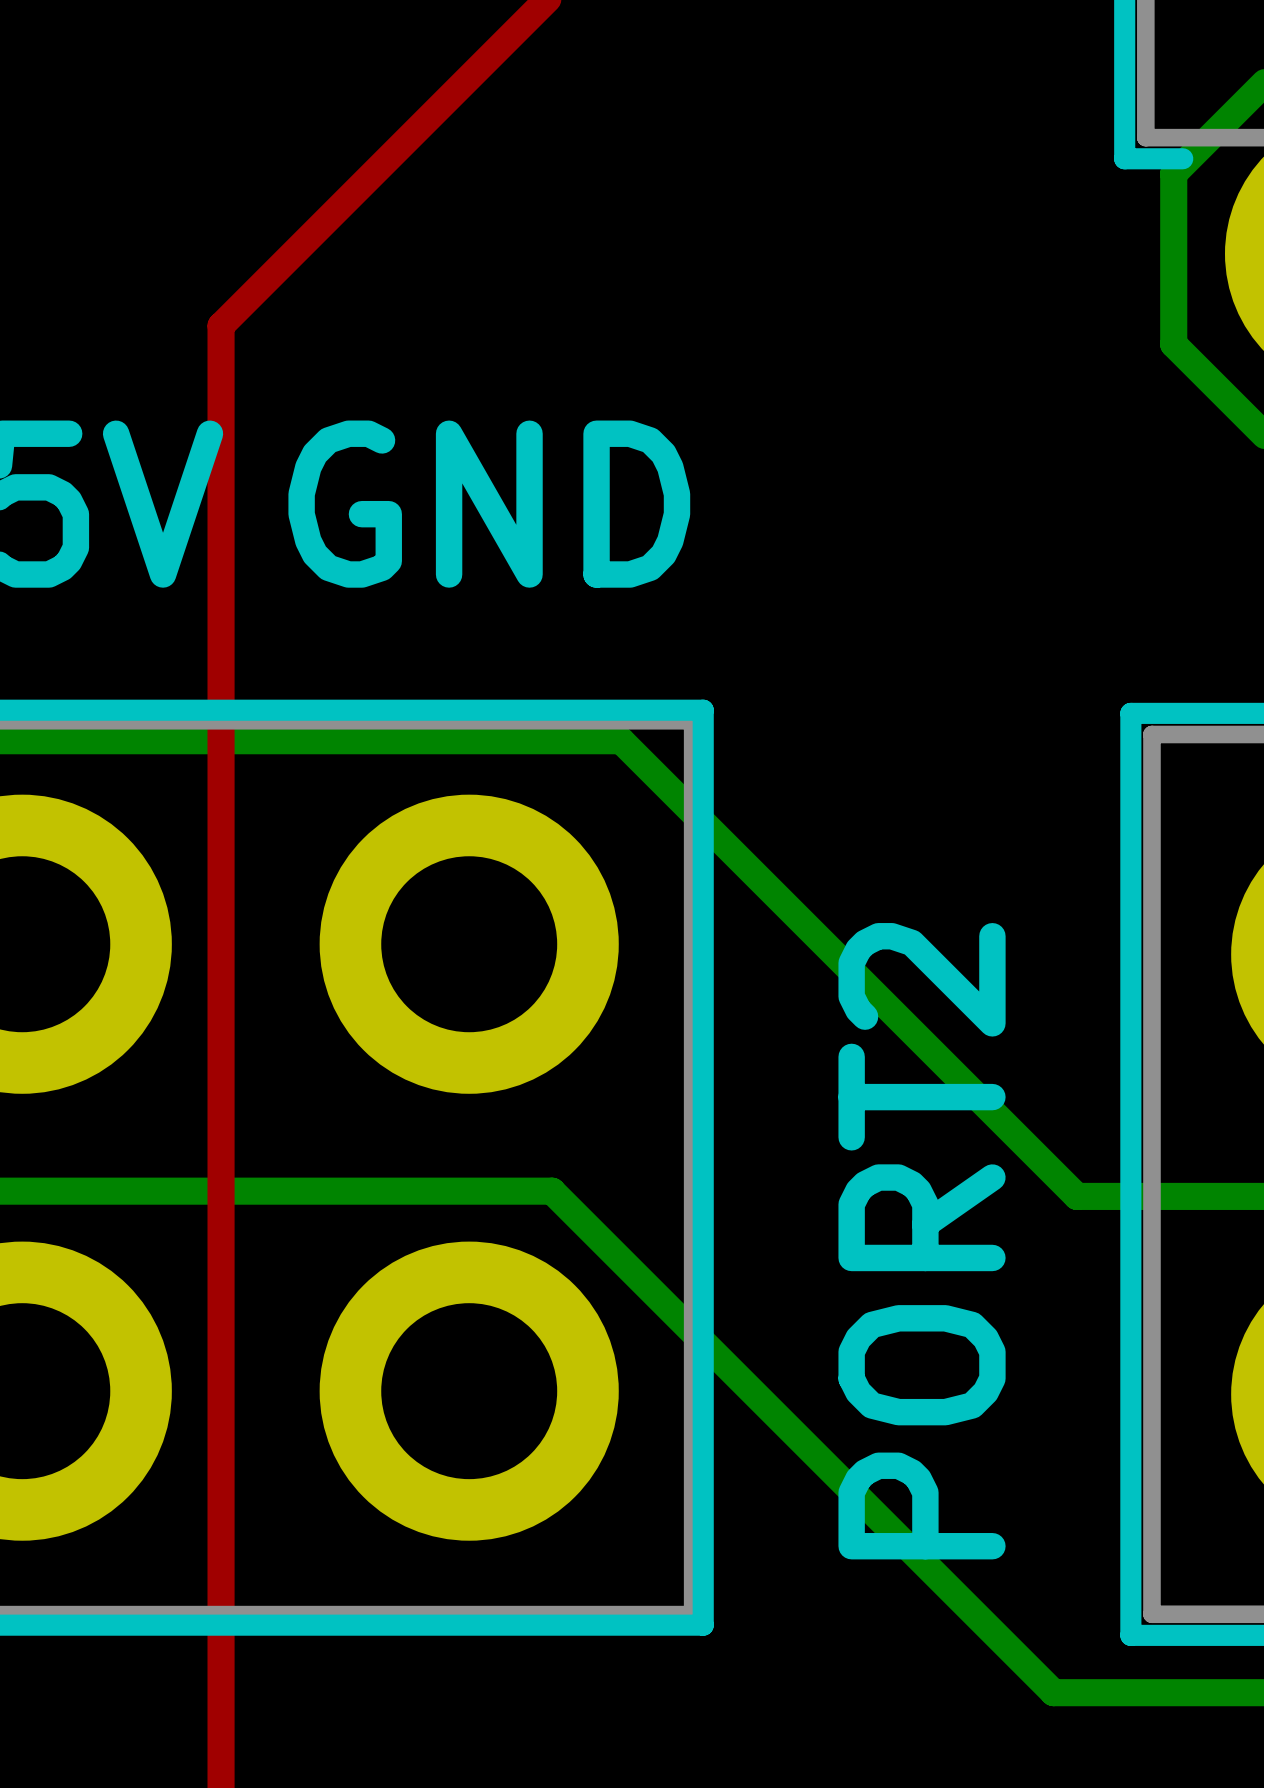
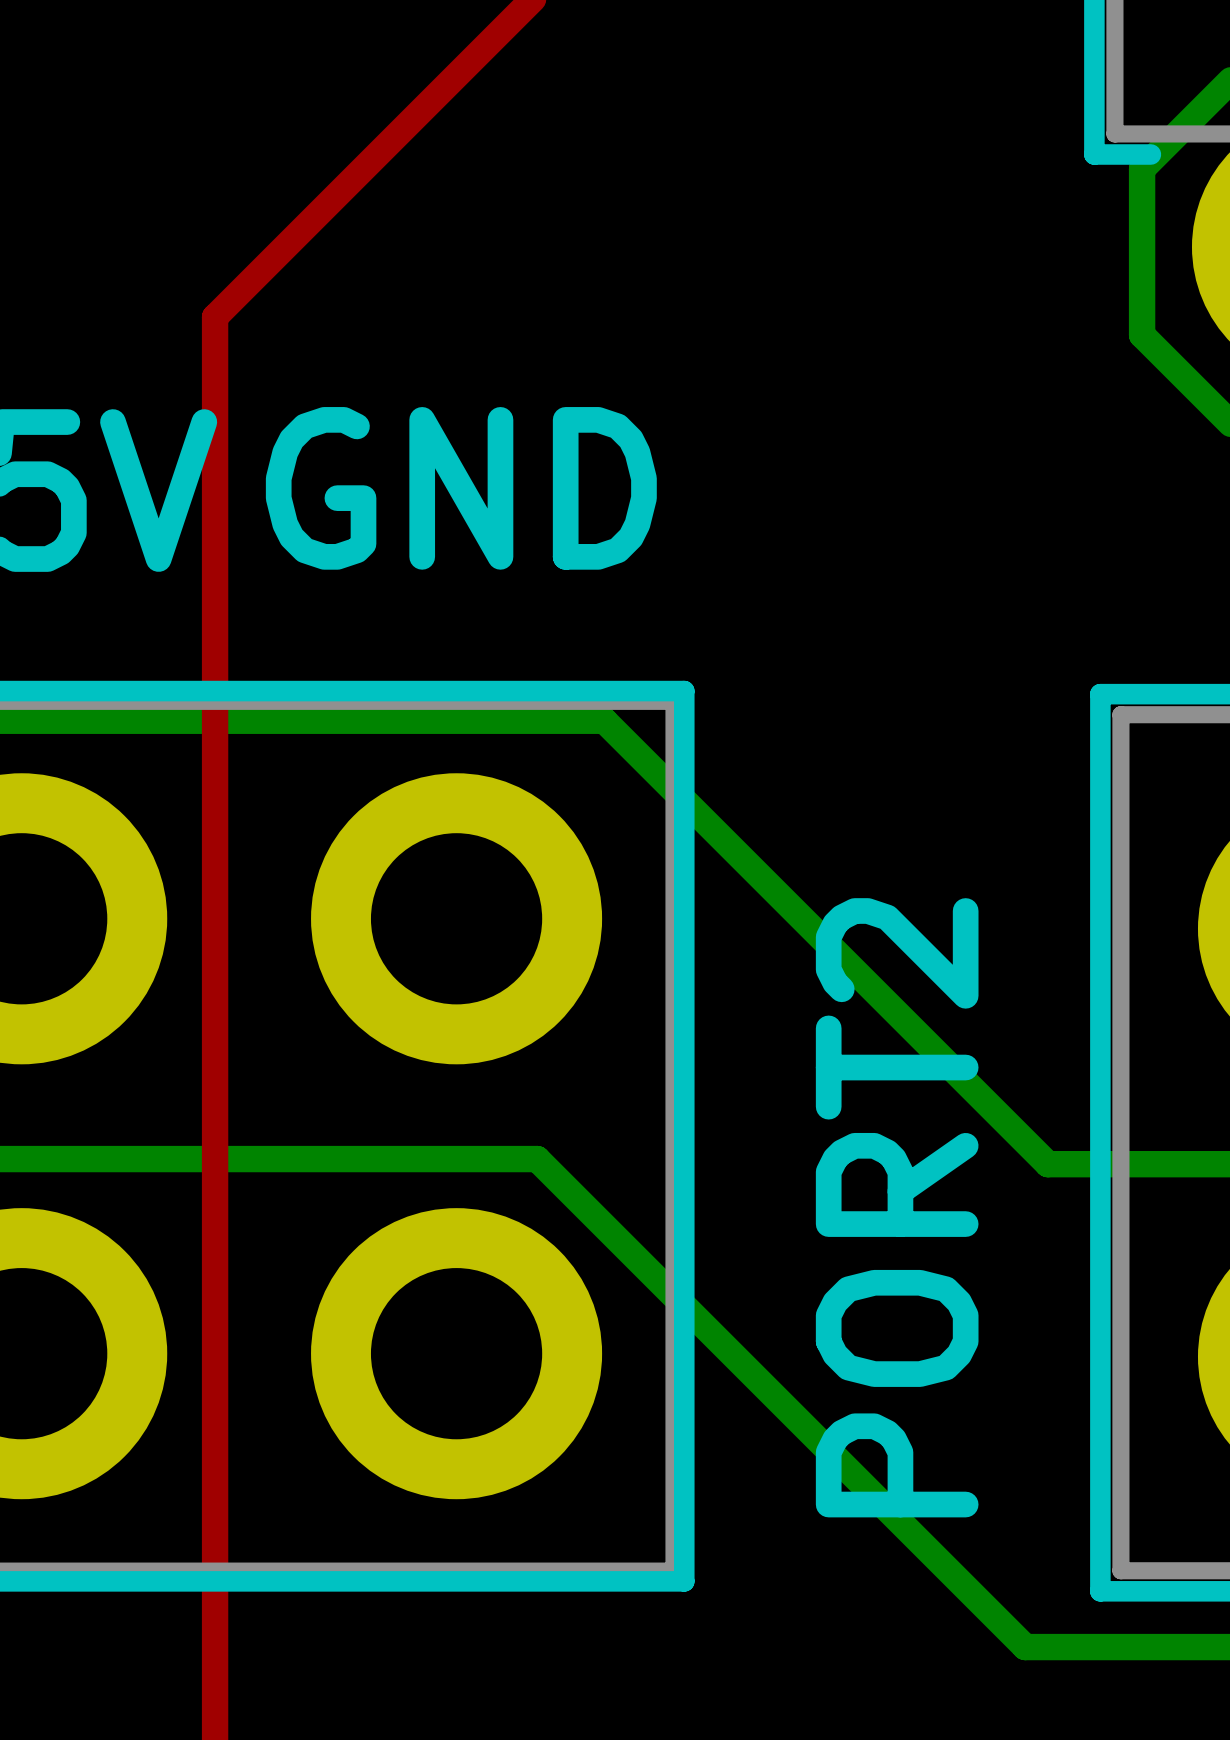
text position: GND (489, 504) -> GND (461, 488)

